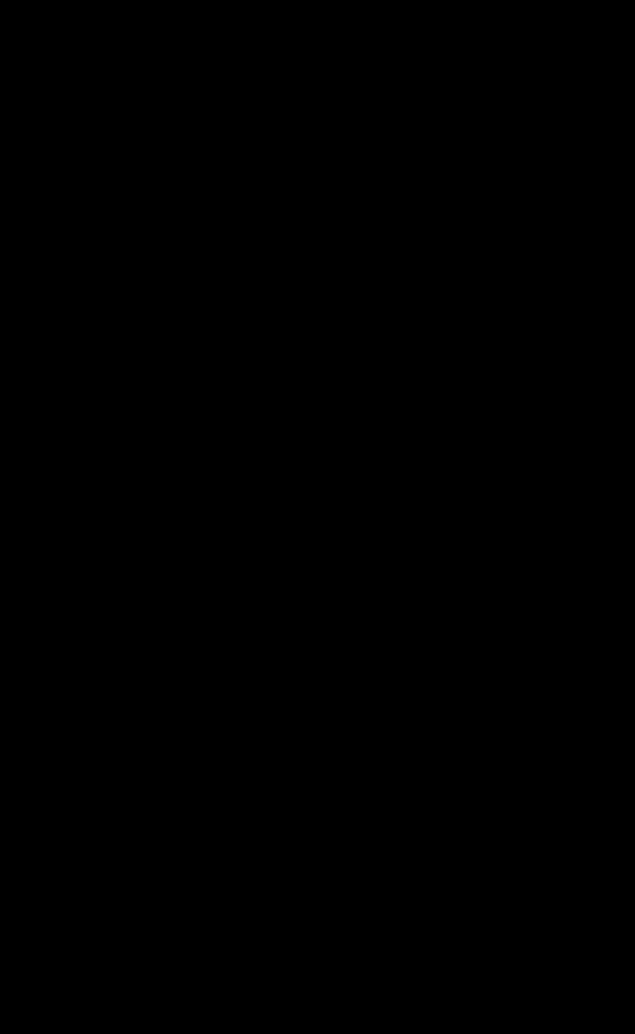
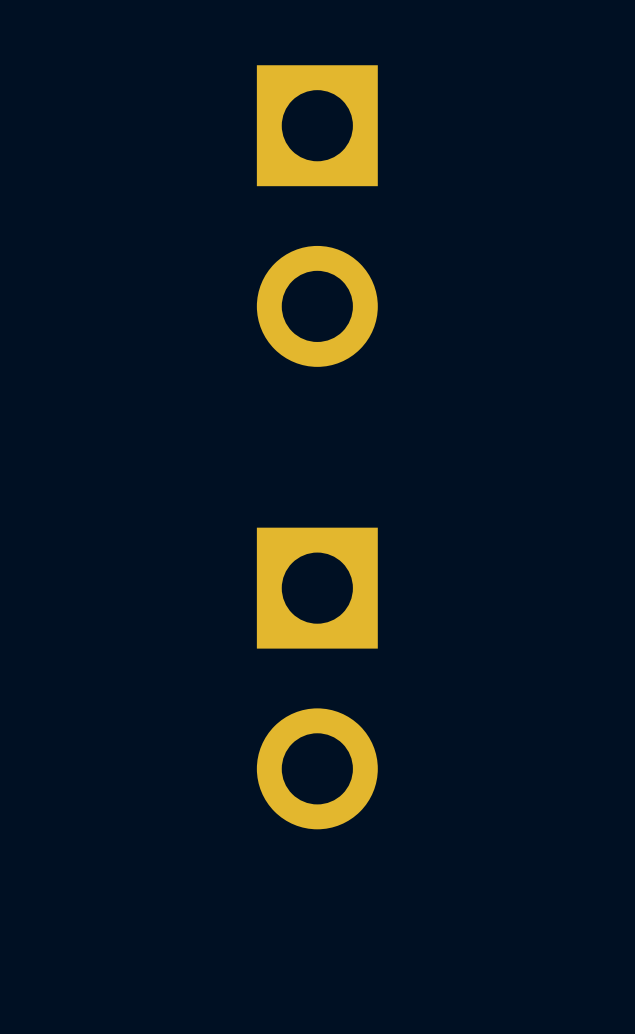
part: none -> (317, 216)
part: none -> (317, 678)

